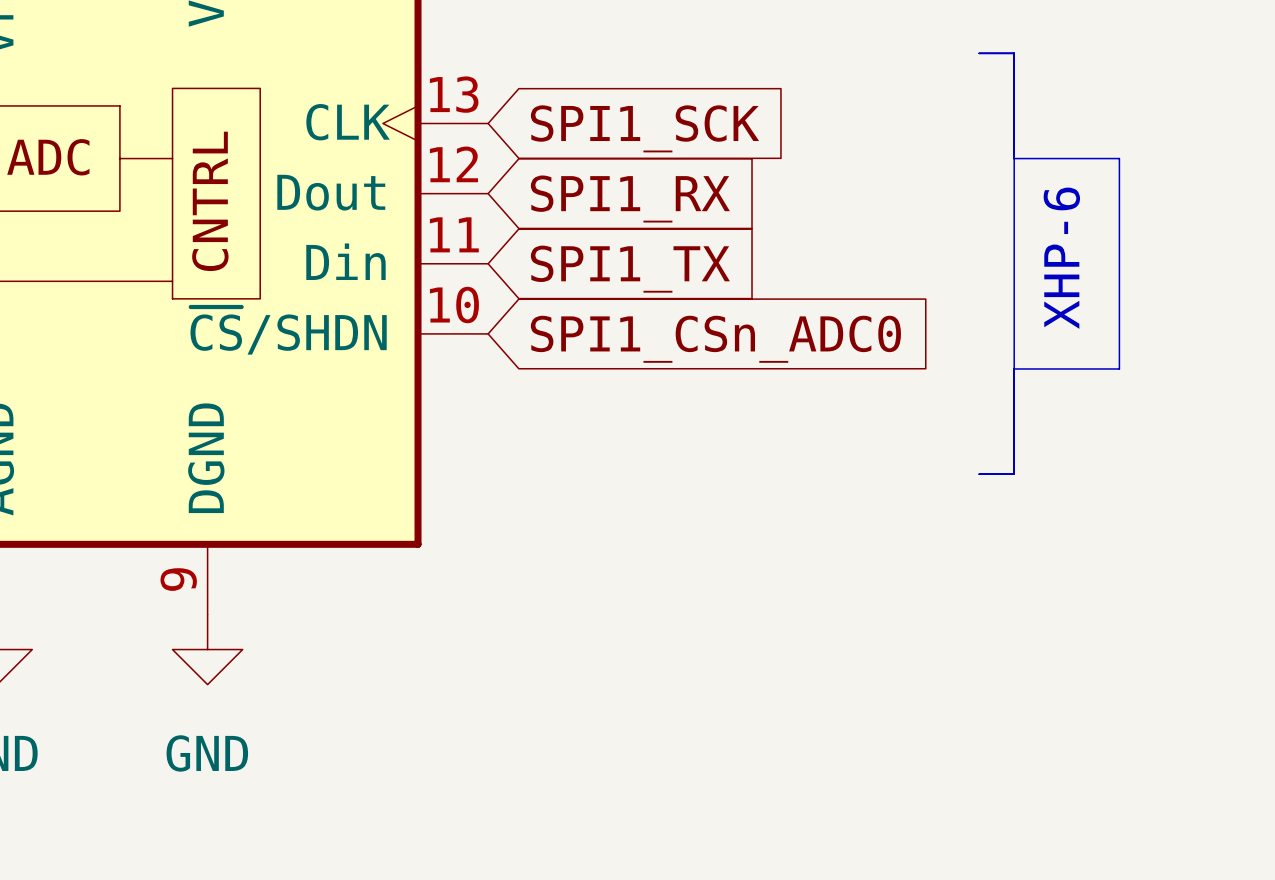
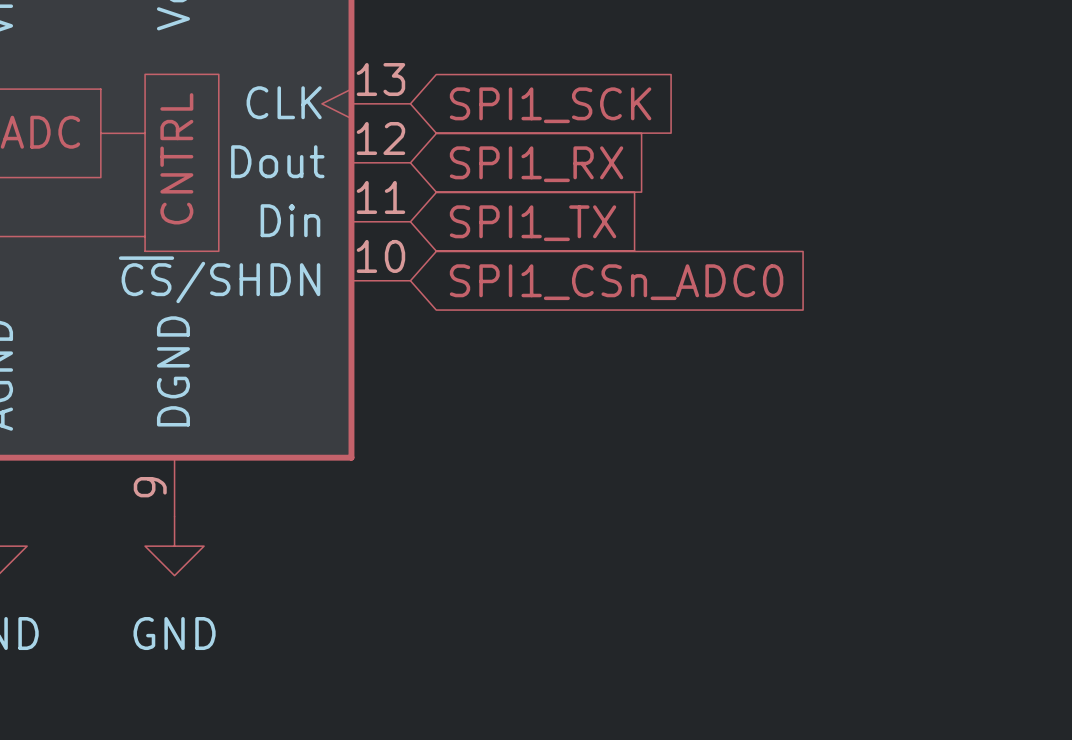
line: (979, 53) (1014, 53) (1014, 474) (979, 474) -> none
line: (1014, 158) (1119, 158) (1119, 368) (1014, 368) -> none
text: XHP-6 (1061, 258) -> none

